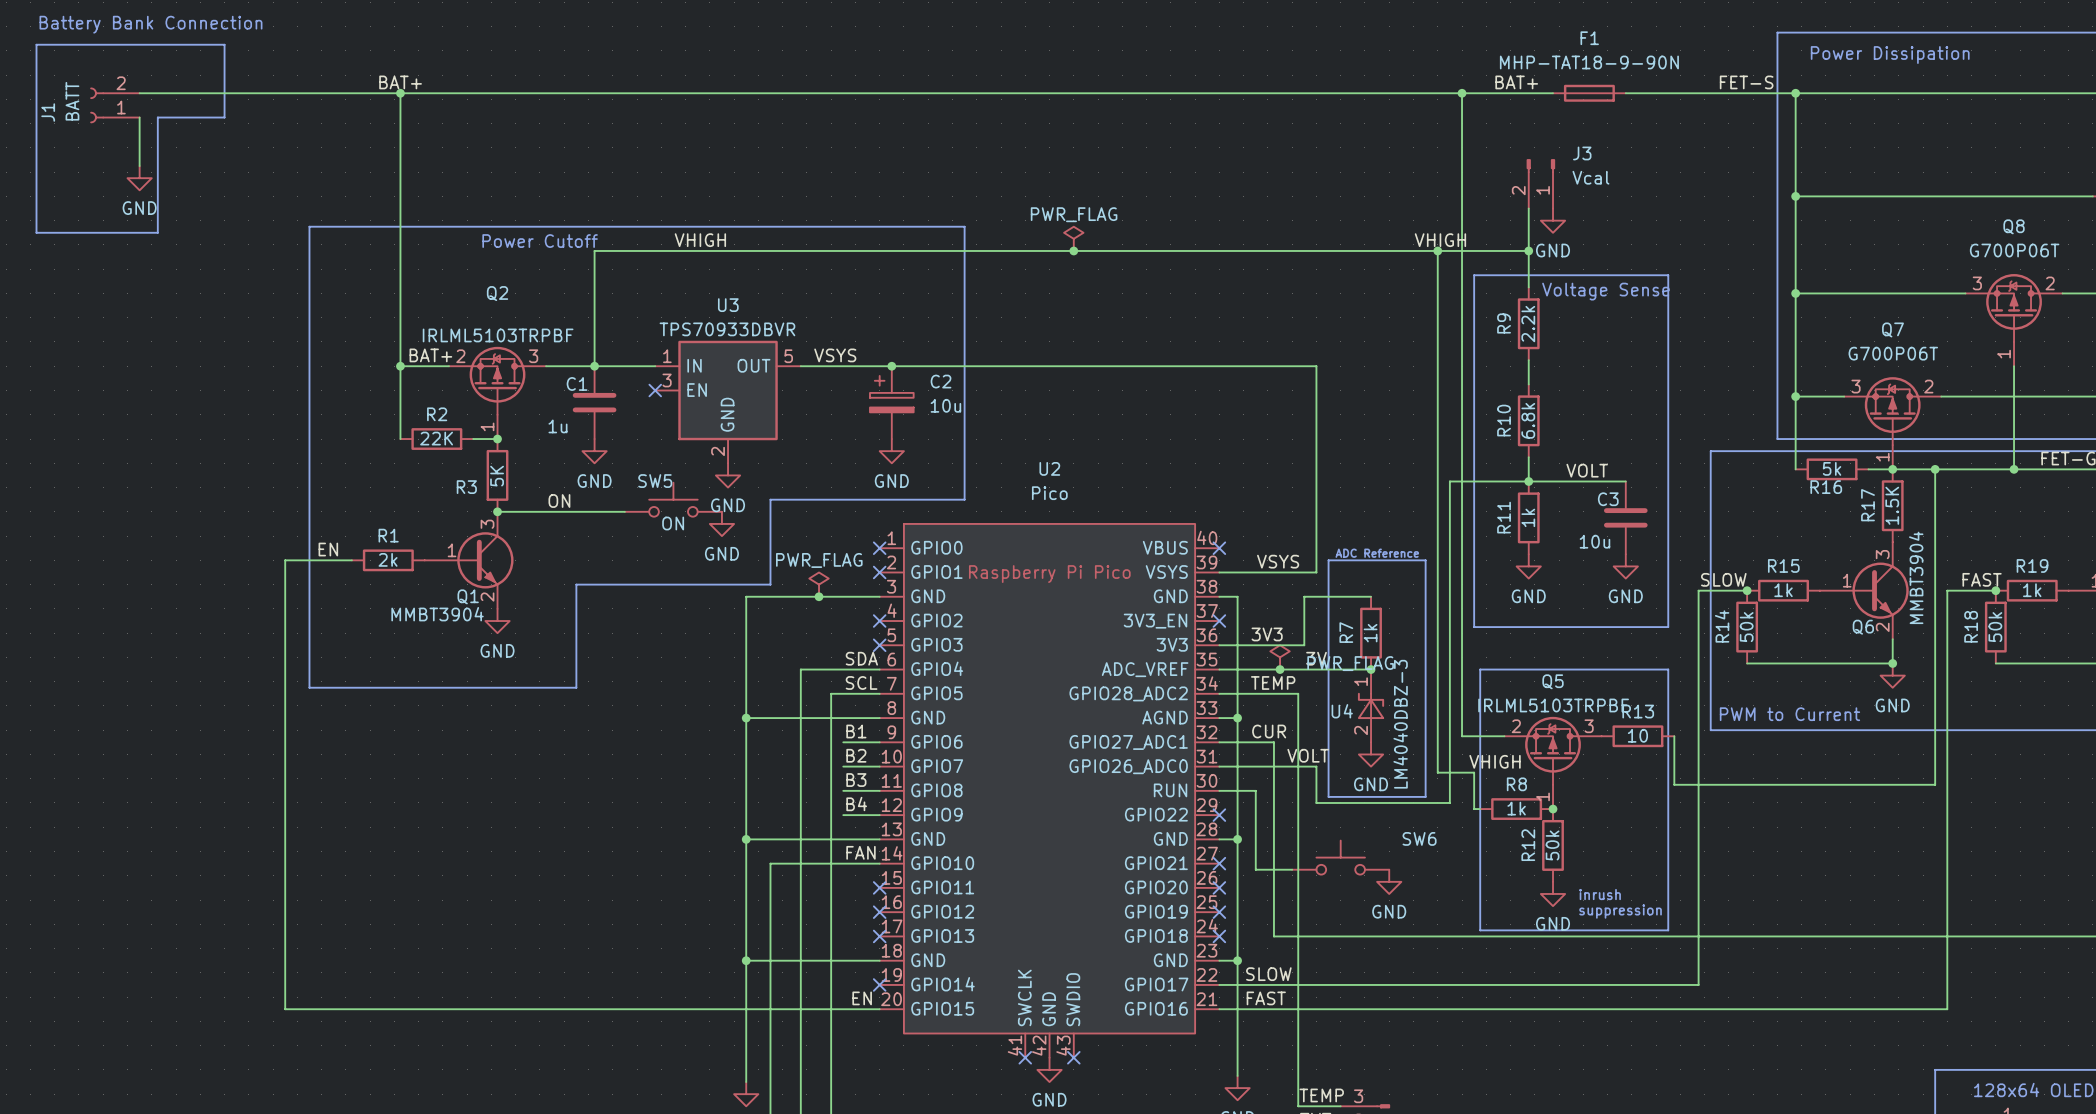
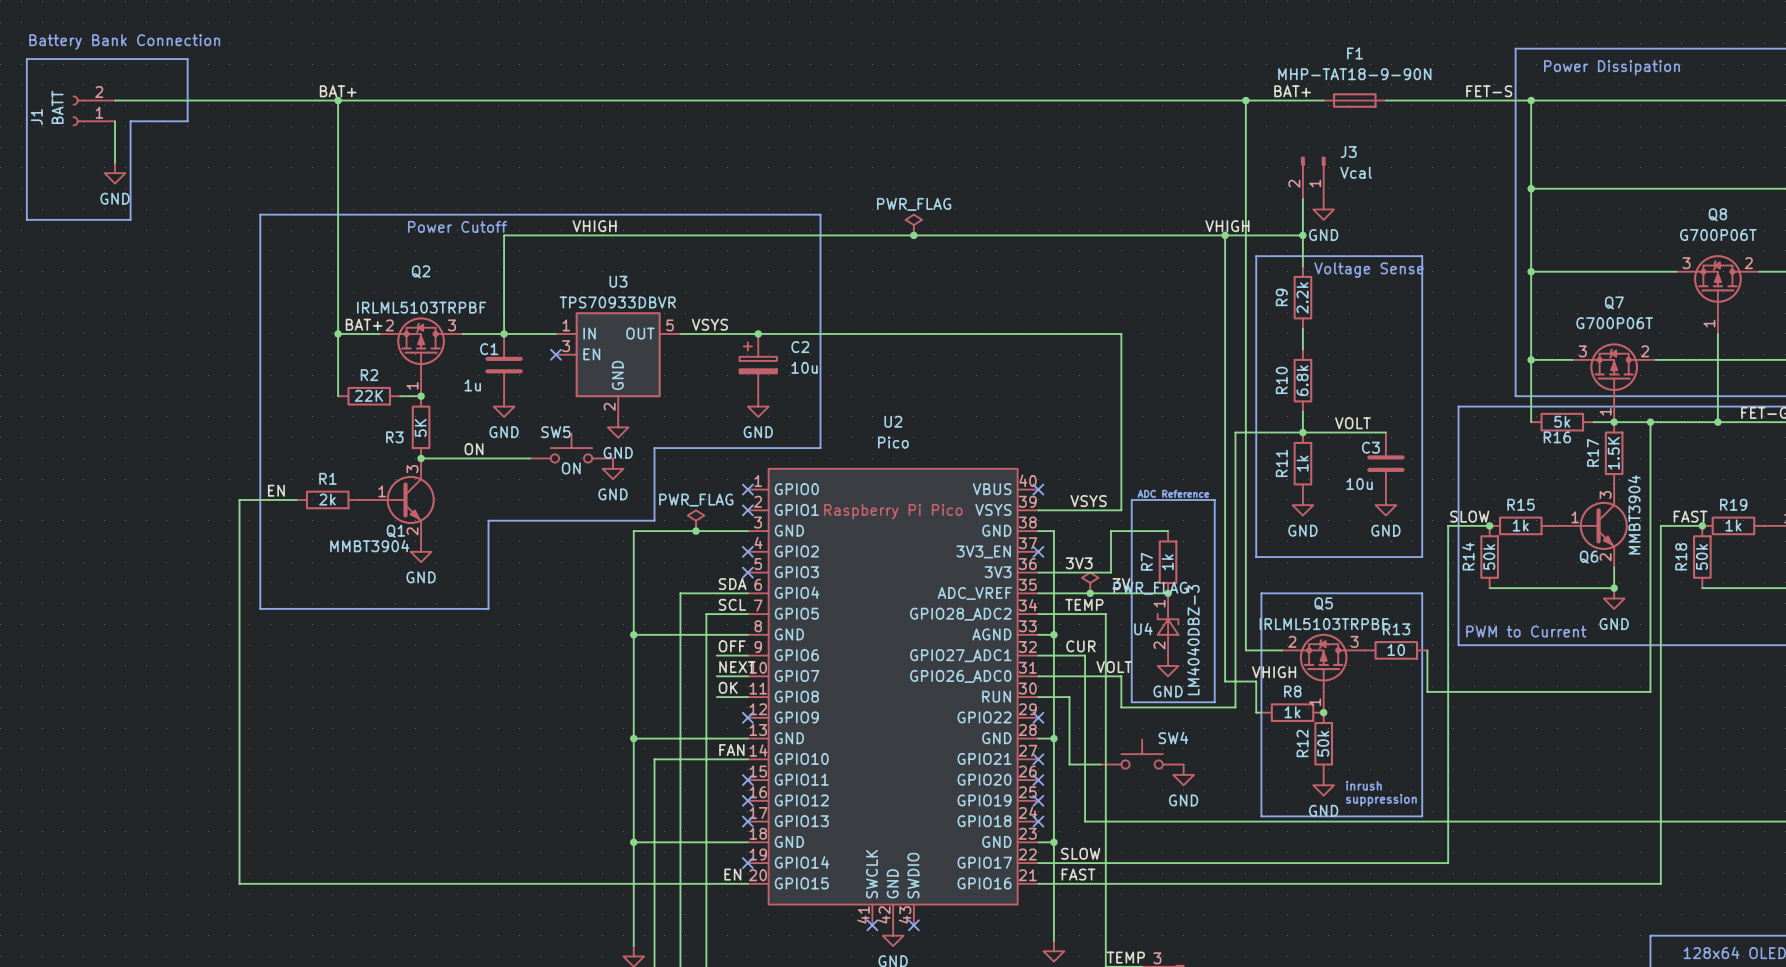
label: B1 (856, 731) -> OFF (732, 646)
label: B2 (856, 755) -> NEXT (737, 667)
label: B3 (856, 780) -> OK (728, 687)
label: B4 (856, 804) -> none
wire: (843, 815) (879, 815) -> none
no-connect mark: none -> (747, 717)
SW6 name: SW6 (1419, 838) -> SW4 (1173, 737)

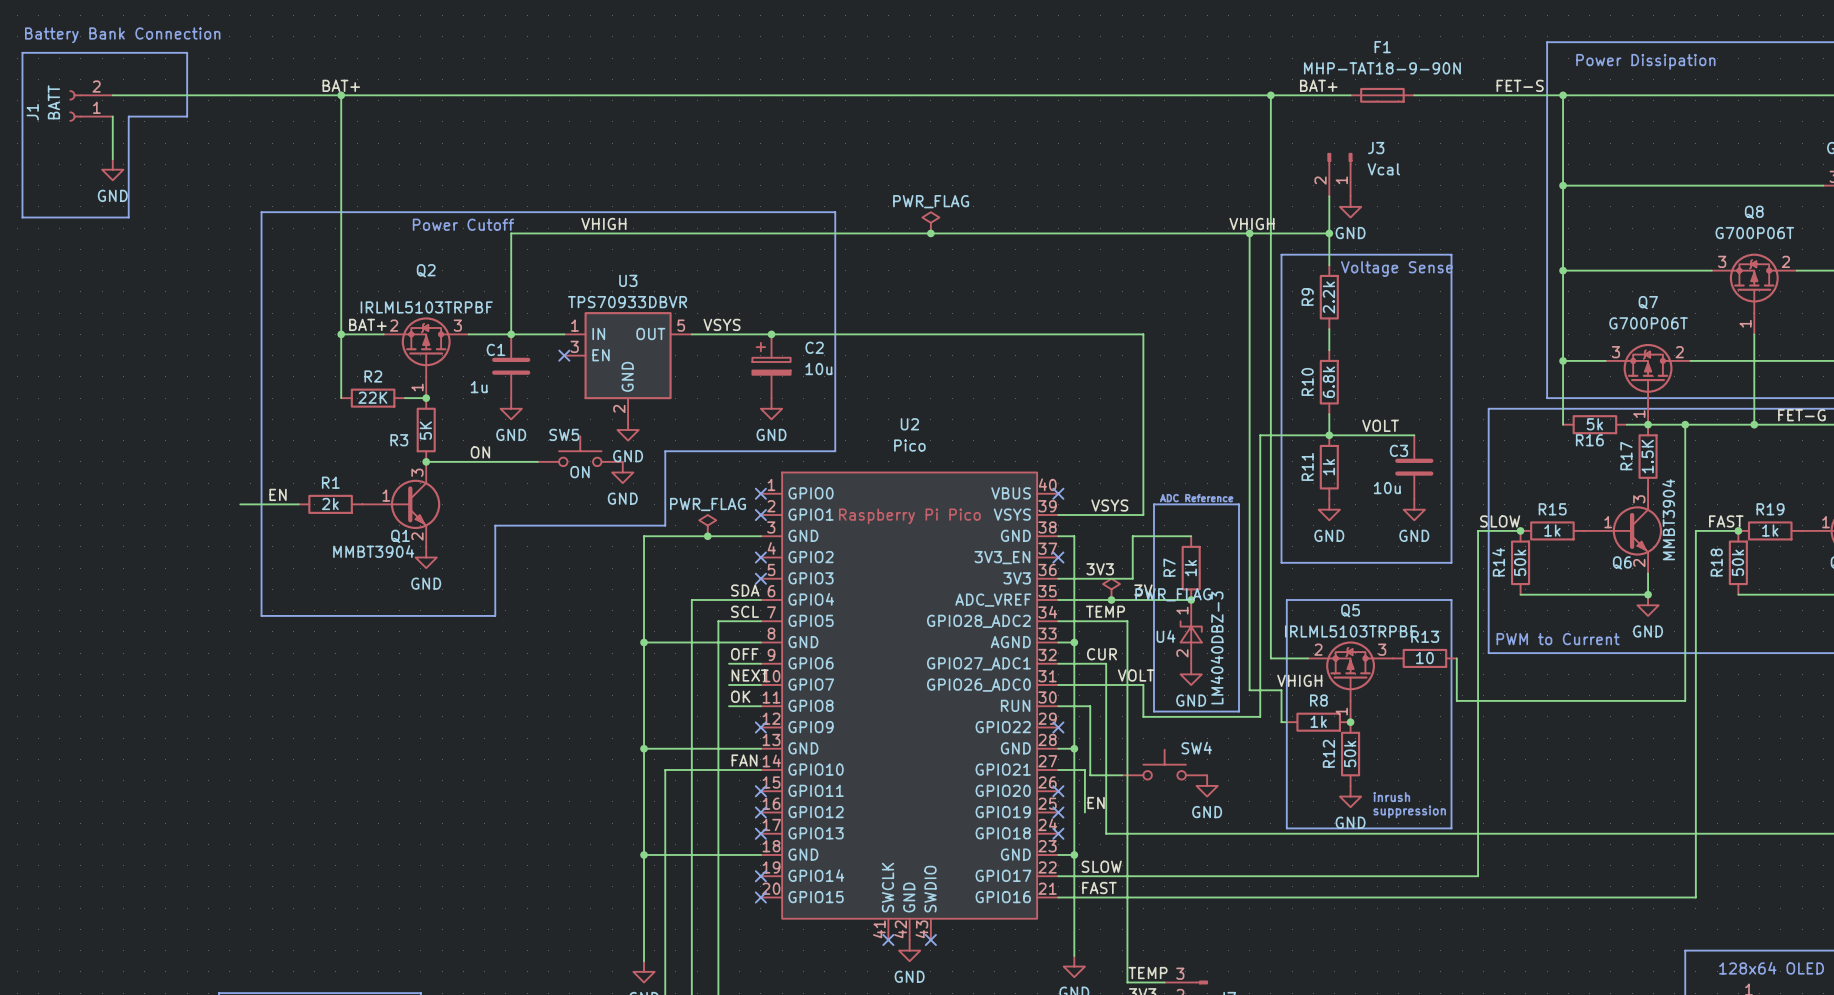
wire: (239, 499) (239, 883) (747, 883) -> none
wire: none -> (1058, 769) (1084, 769) (1084, 812)
no-connect mark: (1038, 759) -> none
label: none -> EN (1096, 803)
label: EN (732, 874) -> none
no-connect mark: none -> (760, 897)

